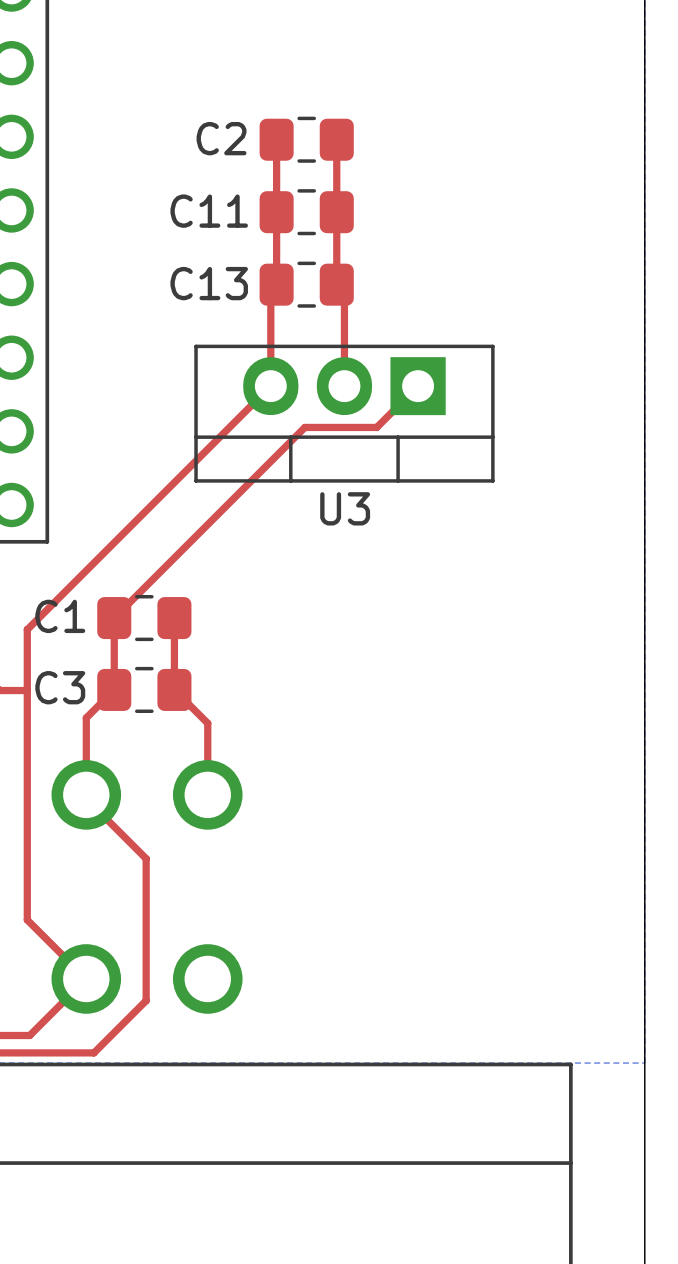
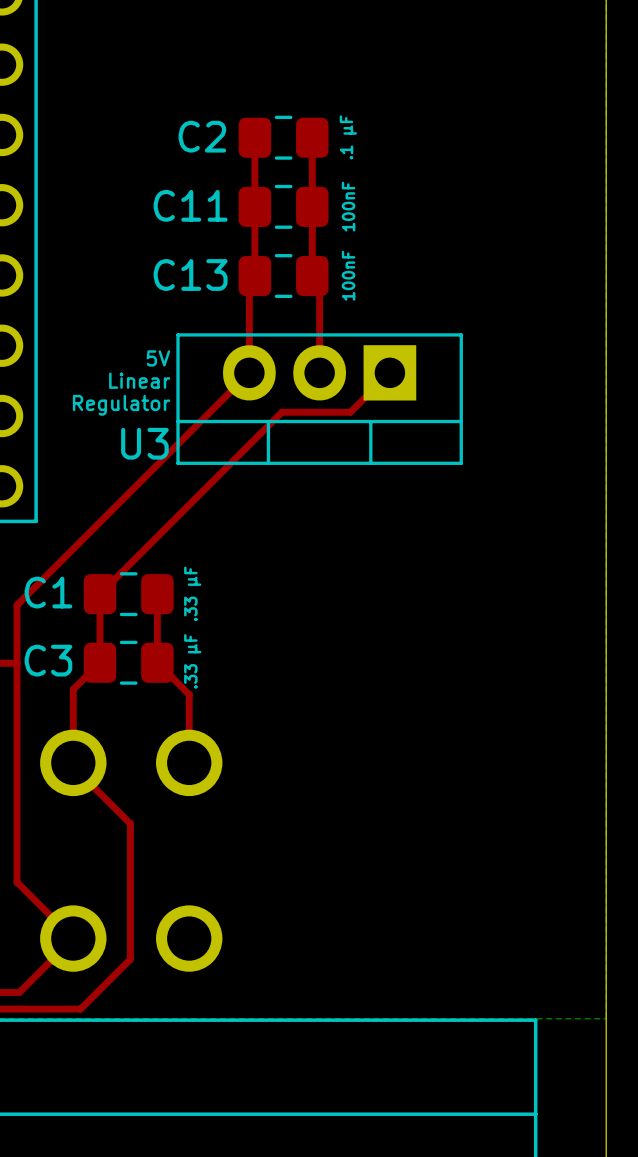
C2 value: none -> .1 µF (348, 137)
C11 value: none -> 100nF (348, 206)
C13 value: none -> 100nF (348, 275)
text: none -> 5V (158, 358)
text: none -> Linear (139, 380)
text: none -> Regulator (121, 405)
U3 name position: U3 (345, 508) -> U3 (144, 443)
C1 value: none -> .33 µF (192, 593)
C3 value: none -> .33 µF (192, 661)

